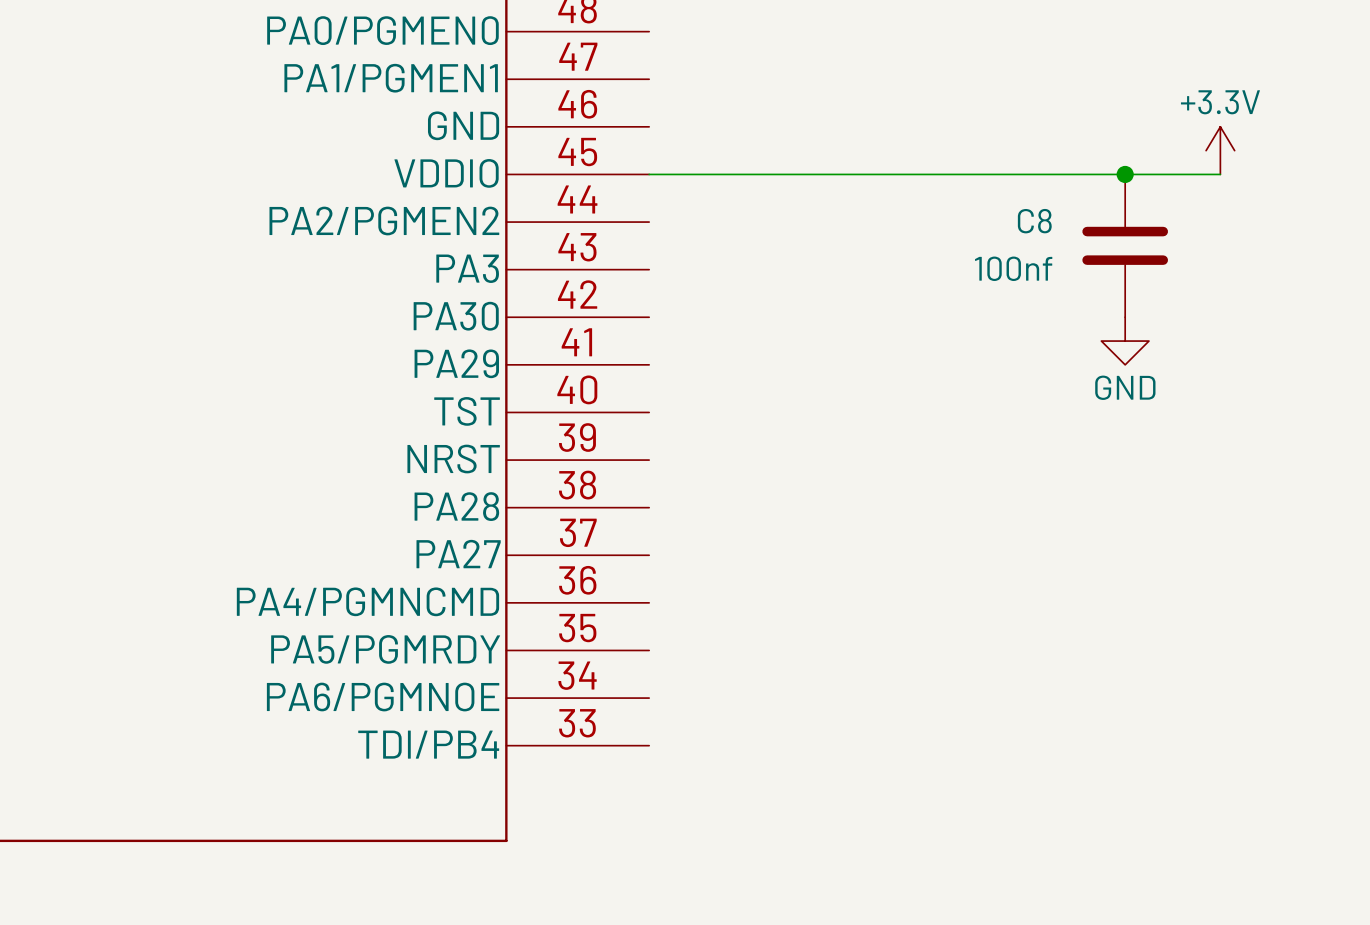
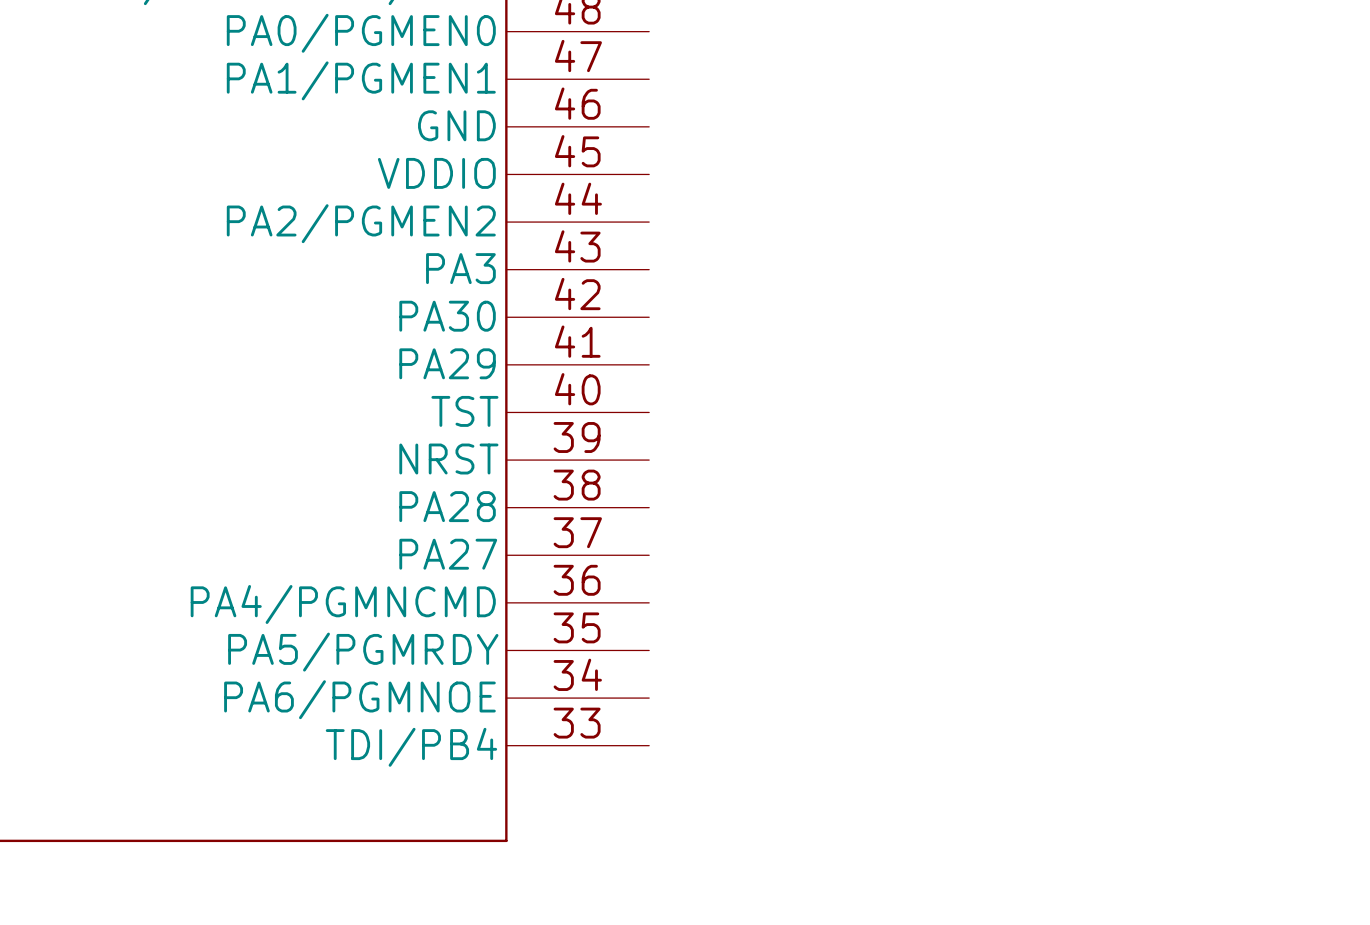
power symbol: +3.3V (1220, 150) -> none
wire: (649, 174) (1220, 174) -> none
junction: (1125, 174) -> none
C8: 100nf (1125, 245) -> none
power symbol: GND (1125, 341) -> none

